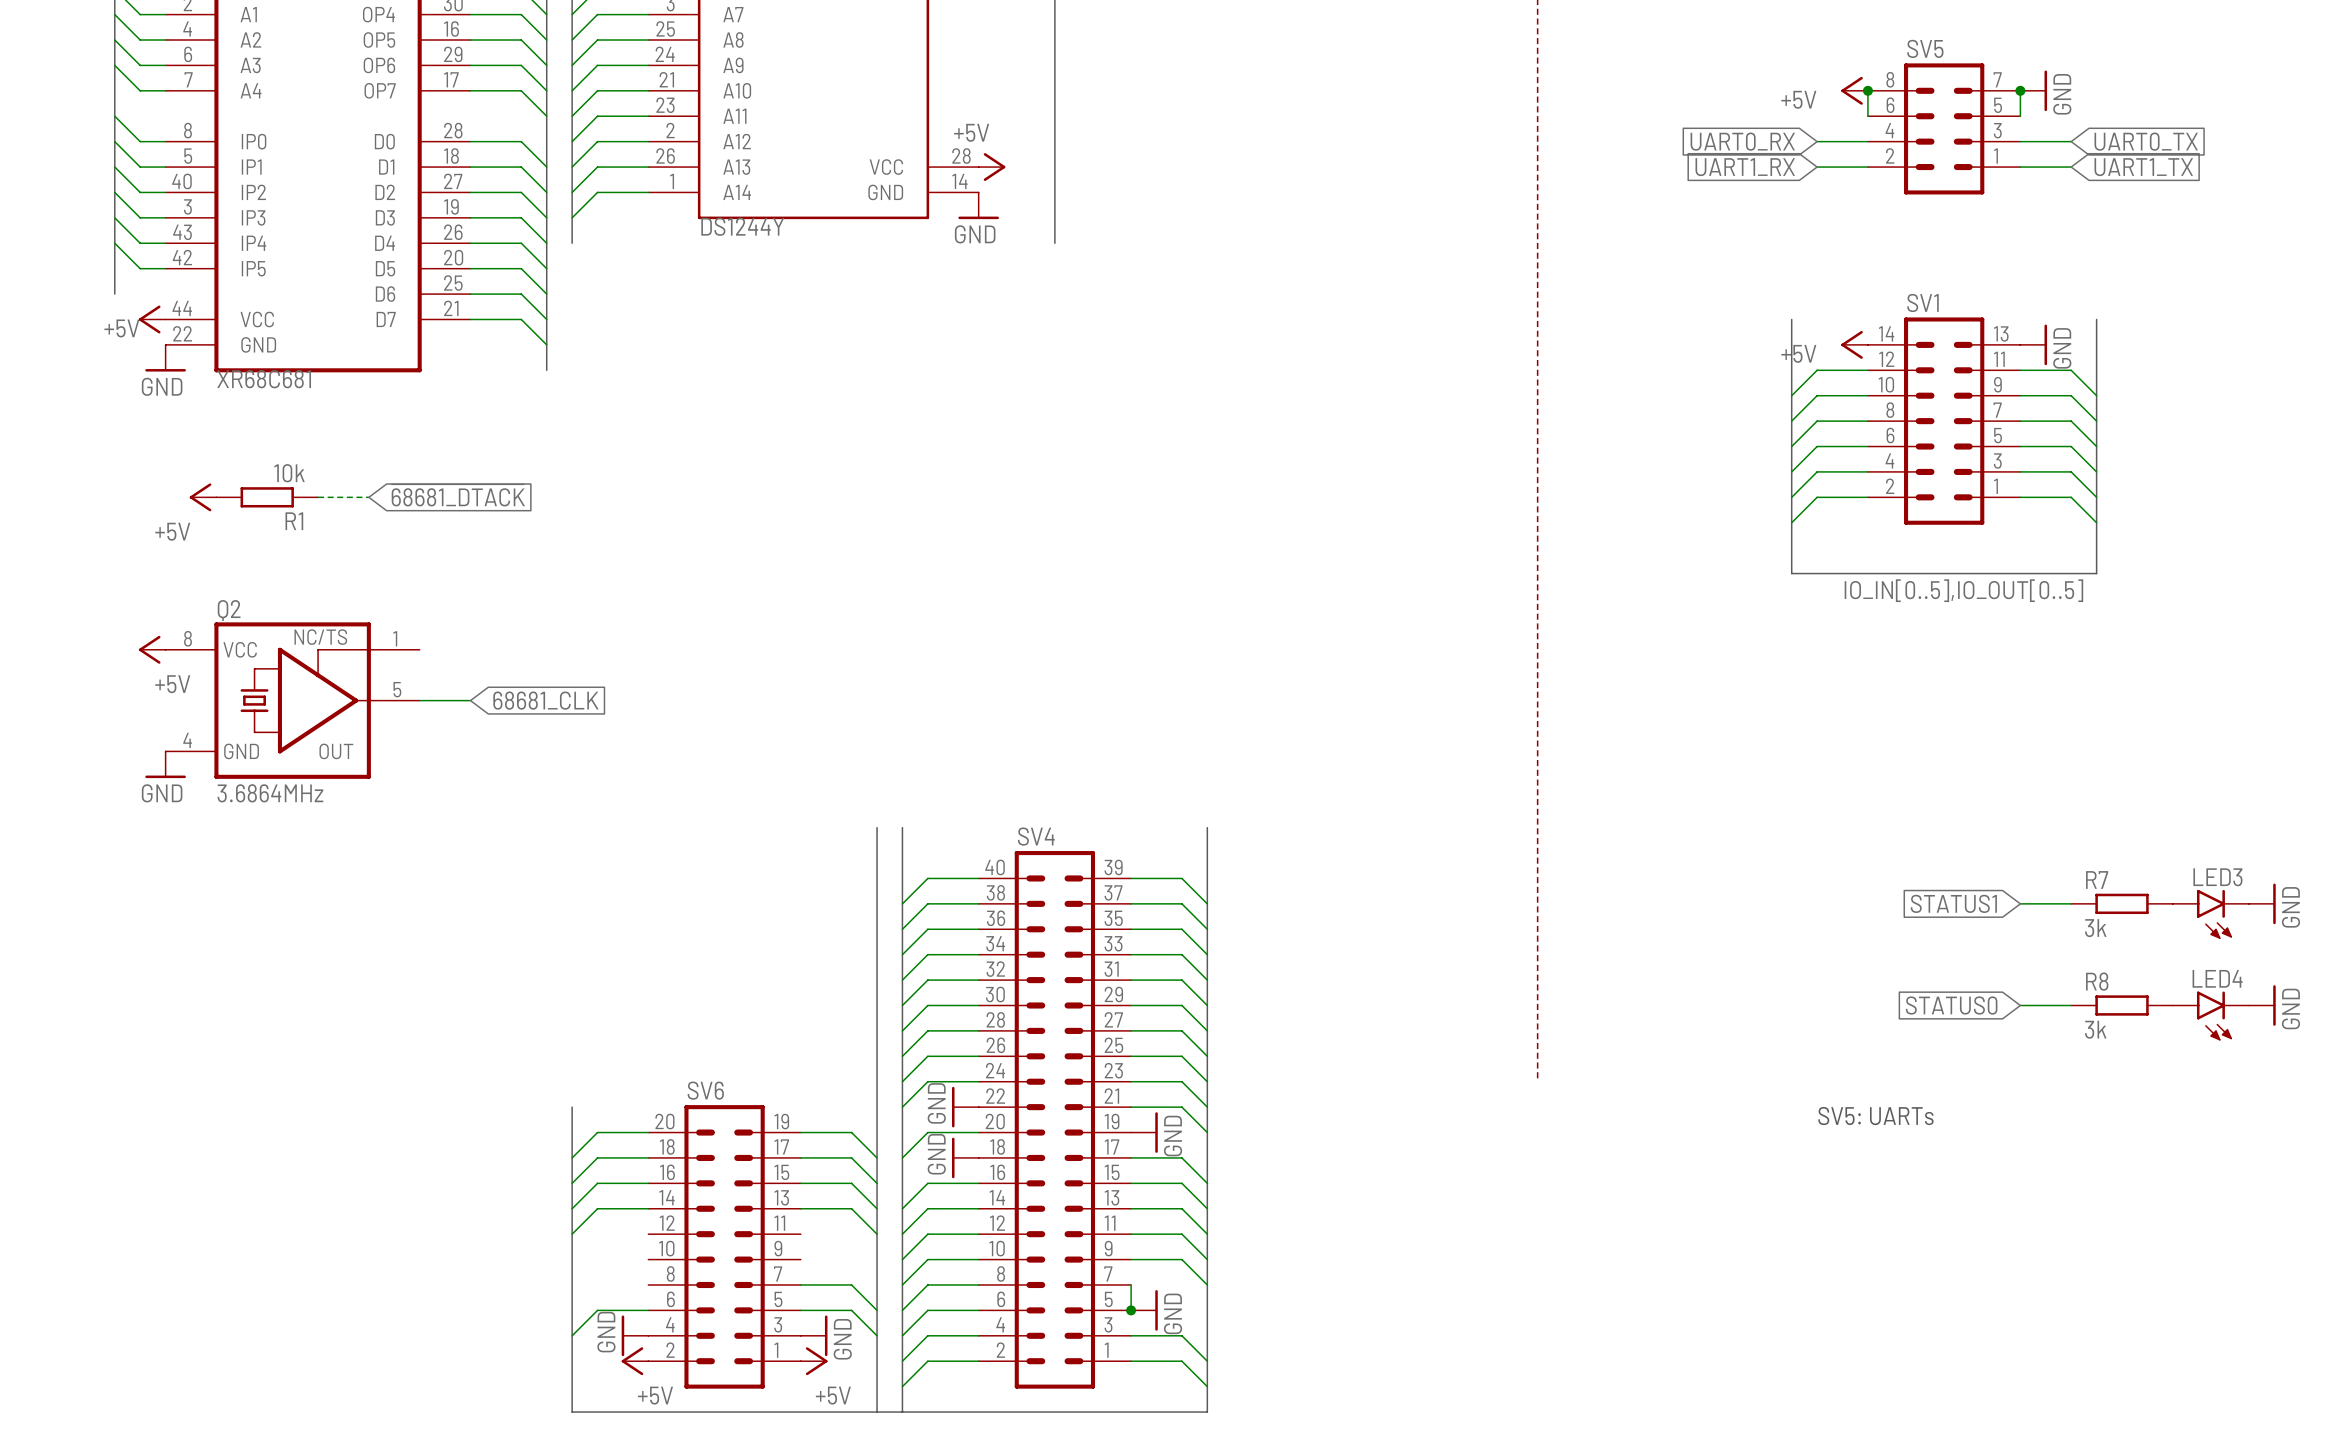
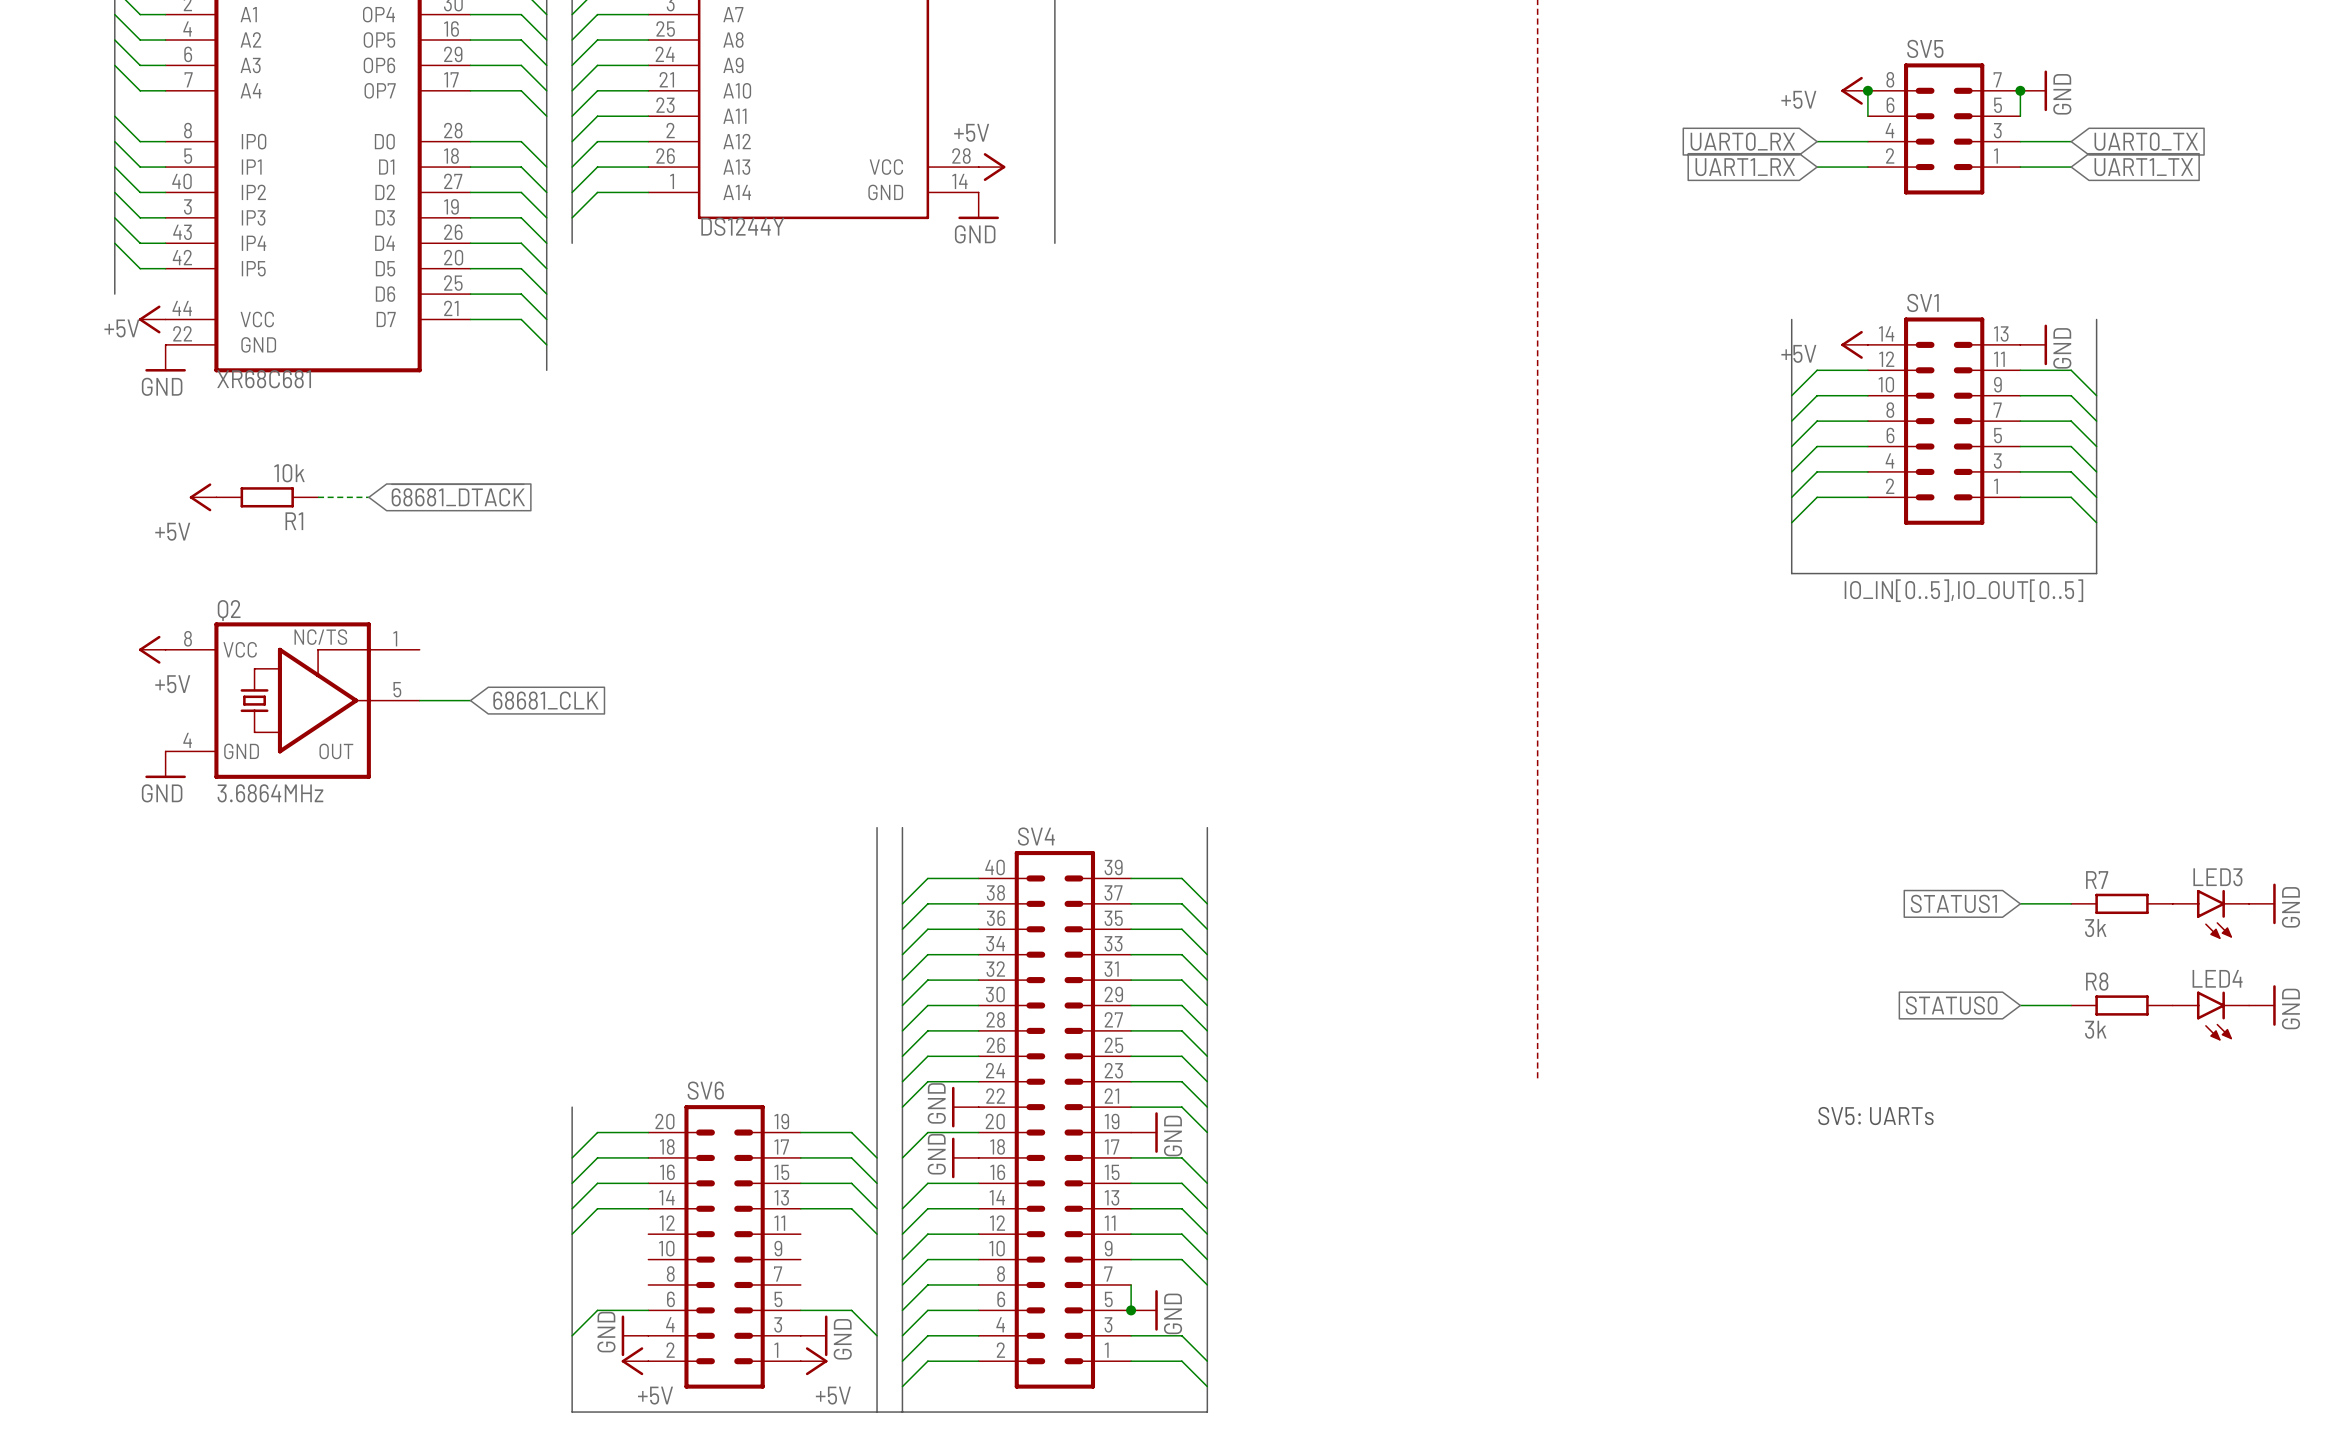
wire: (800, 1284) (851, 1284) (877, 1310) -> none

